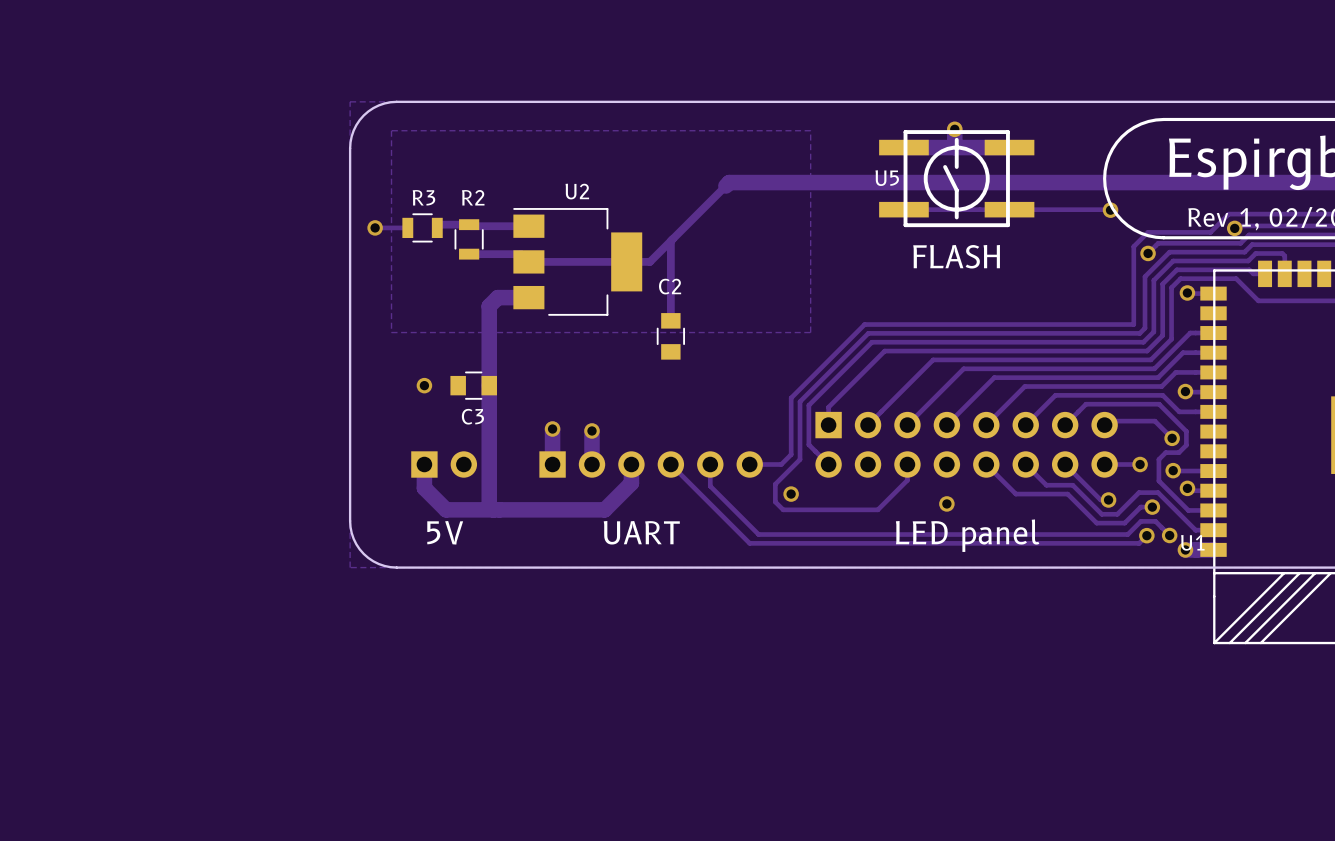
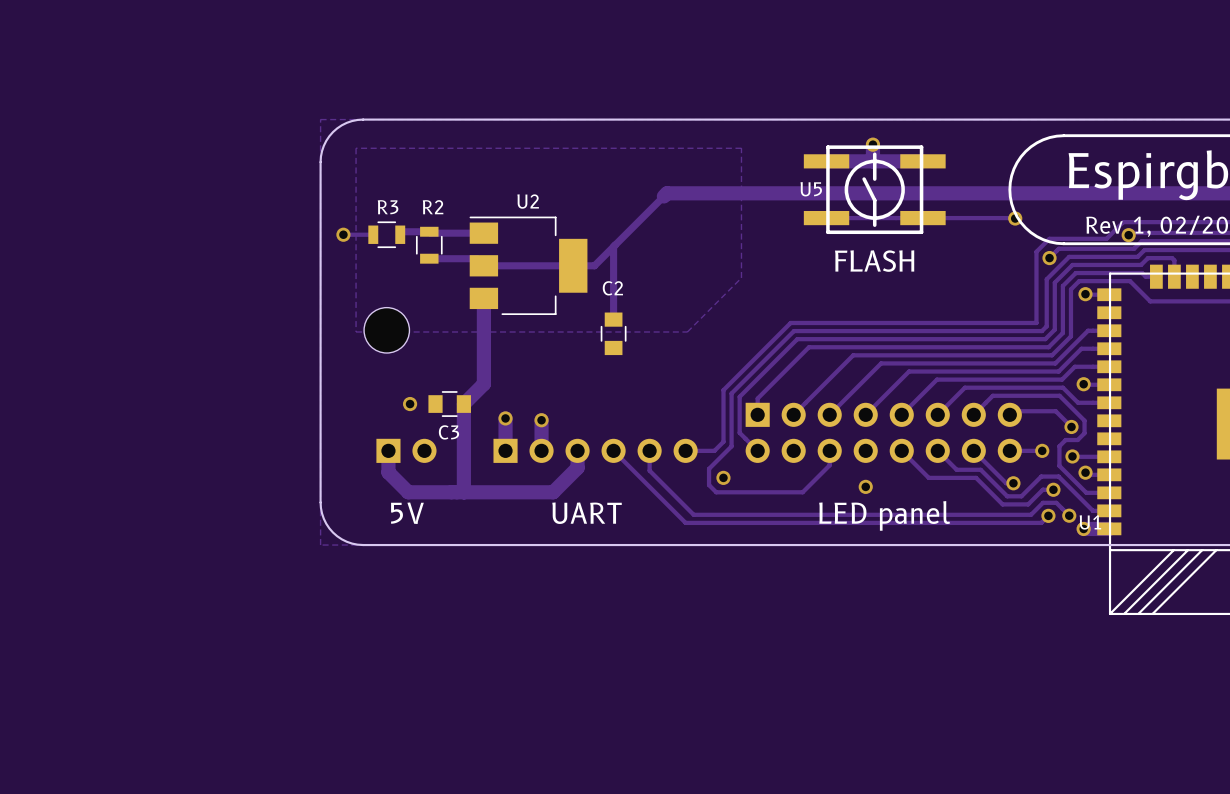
zone outline: (810, 130) (810, 332) (391, 332) (391, 130) (810, 130) -> (741, 148) (741, 277) (687, 331) (356, 331) (356, 148) (741, 148)
track: (528, 297) (497, 297) (489, 306) (489, 505) (493, 509) -> (483, 298) (483, 384) (463, 404) (464, 492)
part: none -> (386, 330)
via position: (424, 385) -> (410, 404)
C3 position: (473, 385) -> (449, 404)

